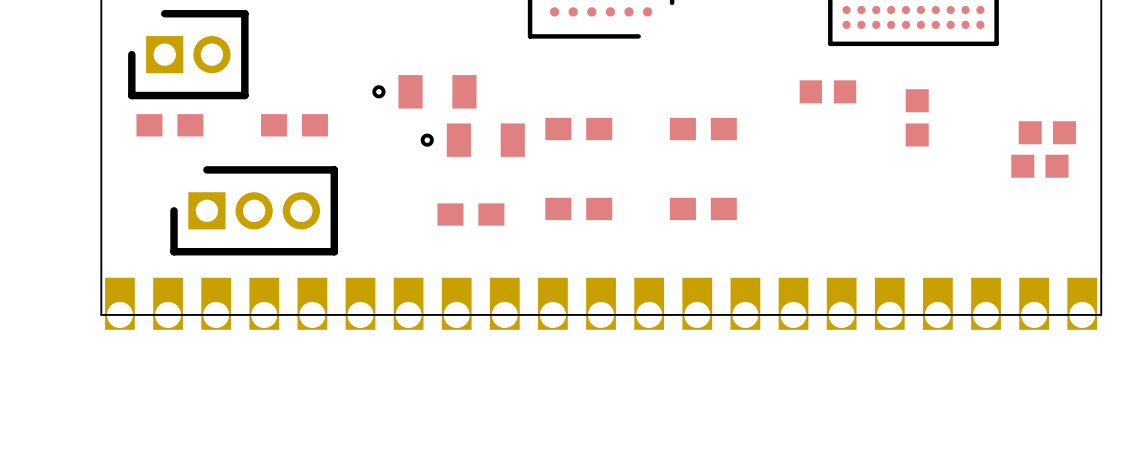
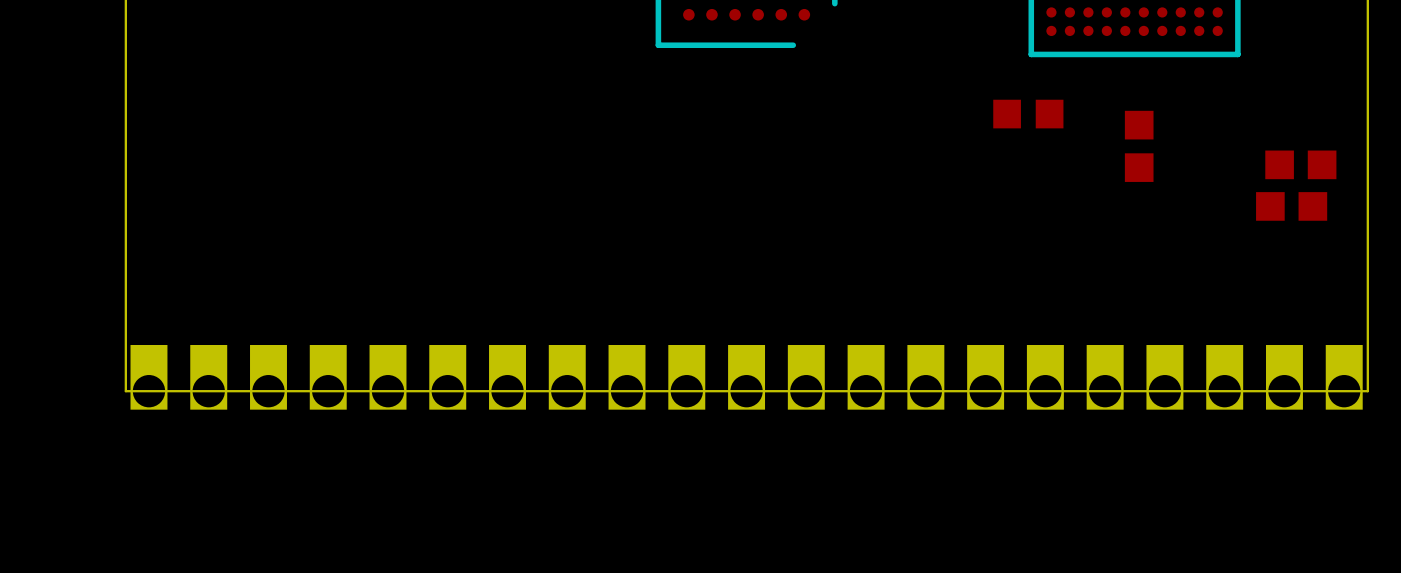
part: (188, 54) -> none
part: (424, 91) -> none
part: (169, 125) -> none
part: (294, 125) -> none
part: (578, 129) -> none
part: (703, 129) -> none
part: (472, 140) -> none
part: (578, 208) -> none
part: (703, 208) -> none
part: (254, 210) -> none
part: (470, 214) -> none

